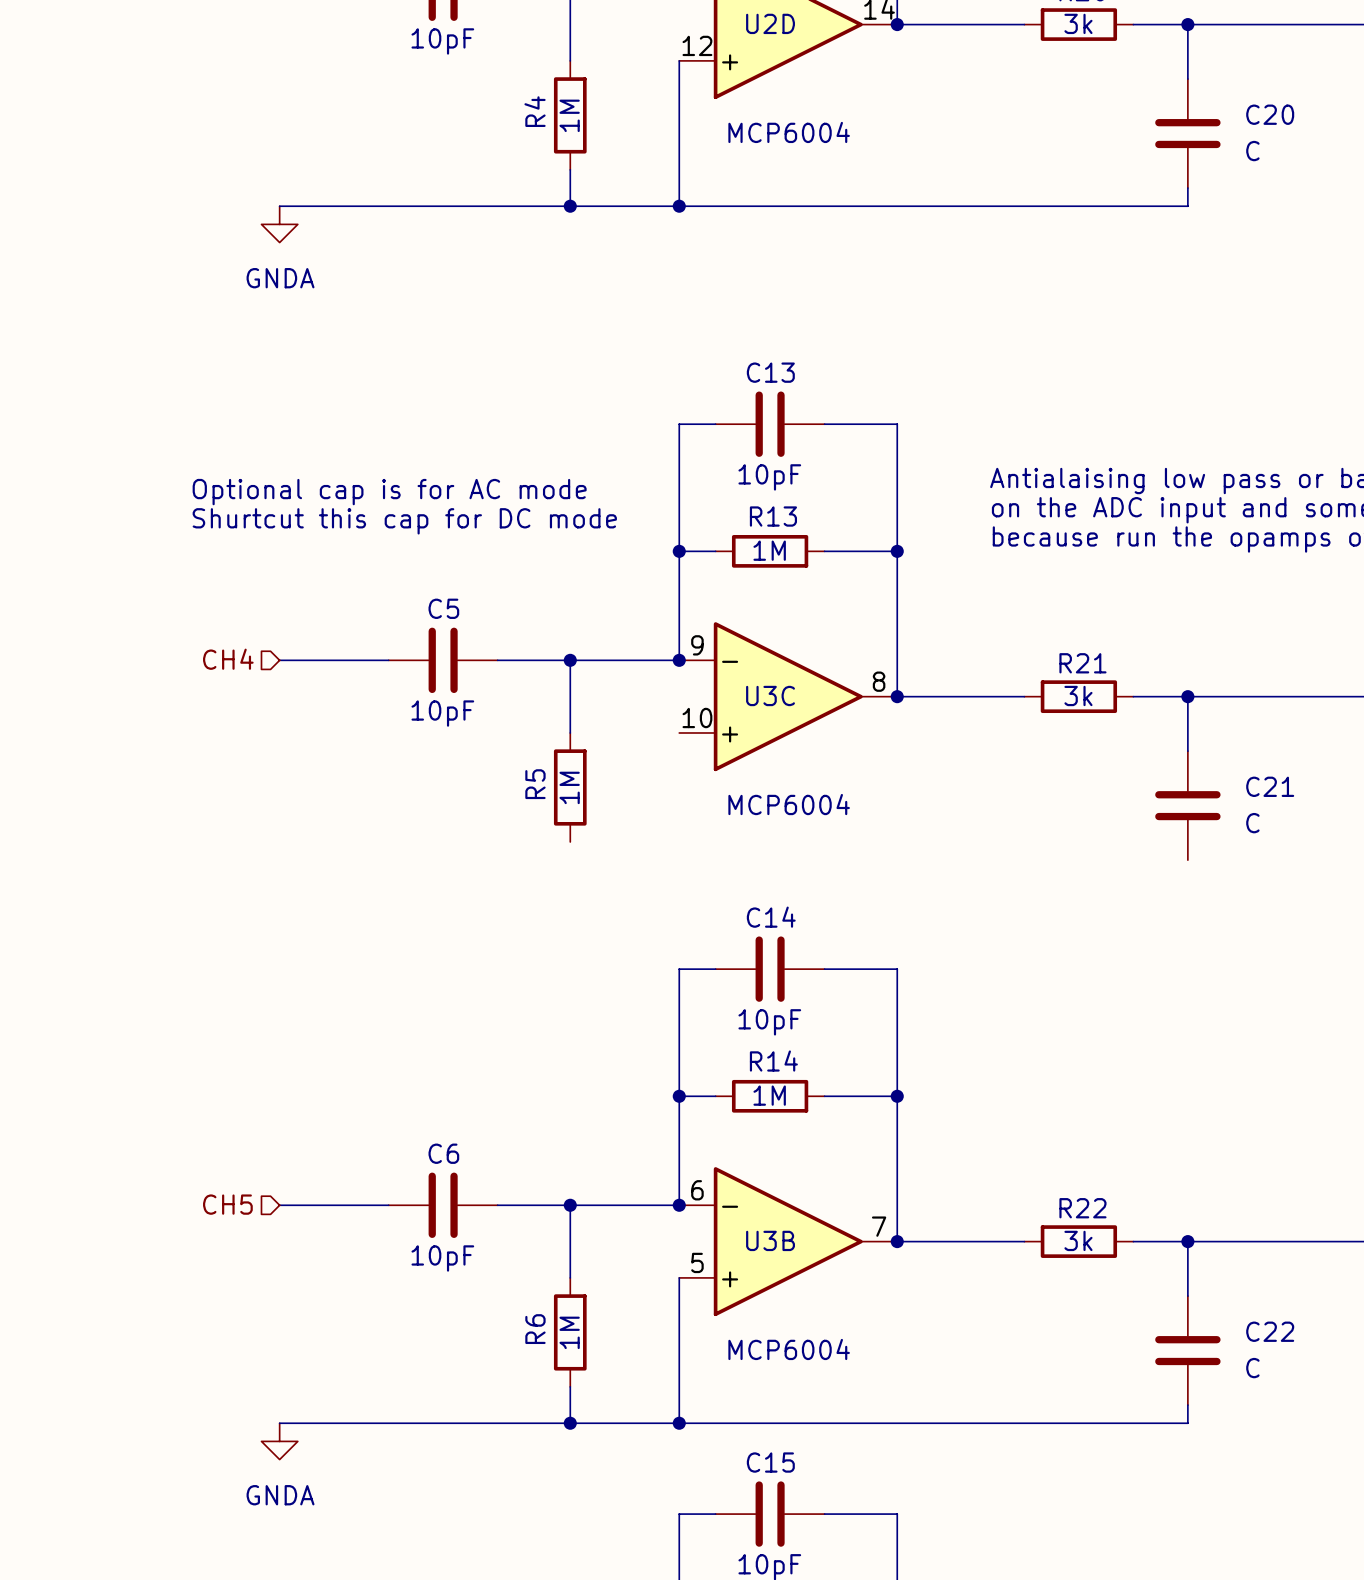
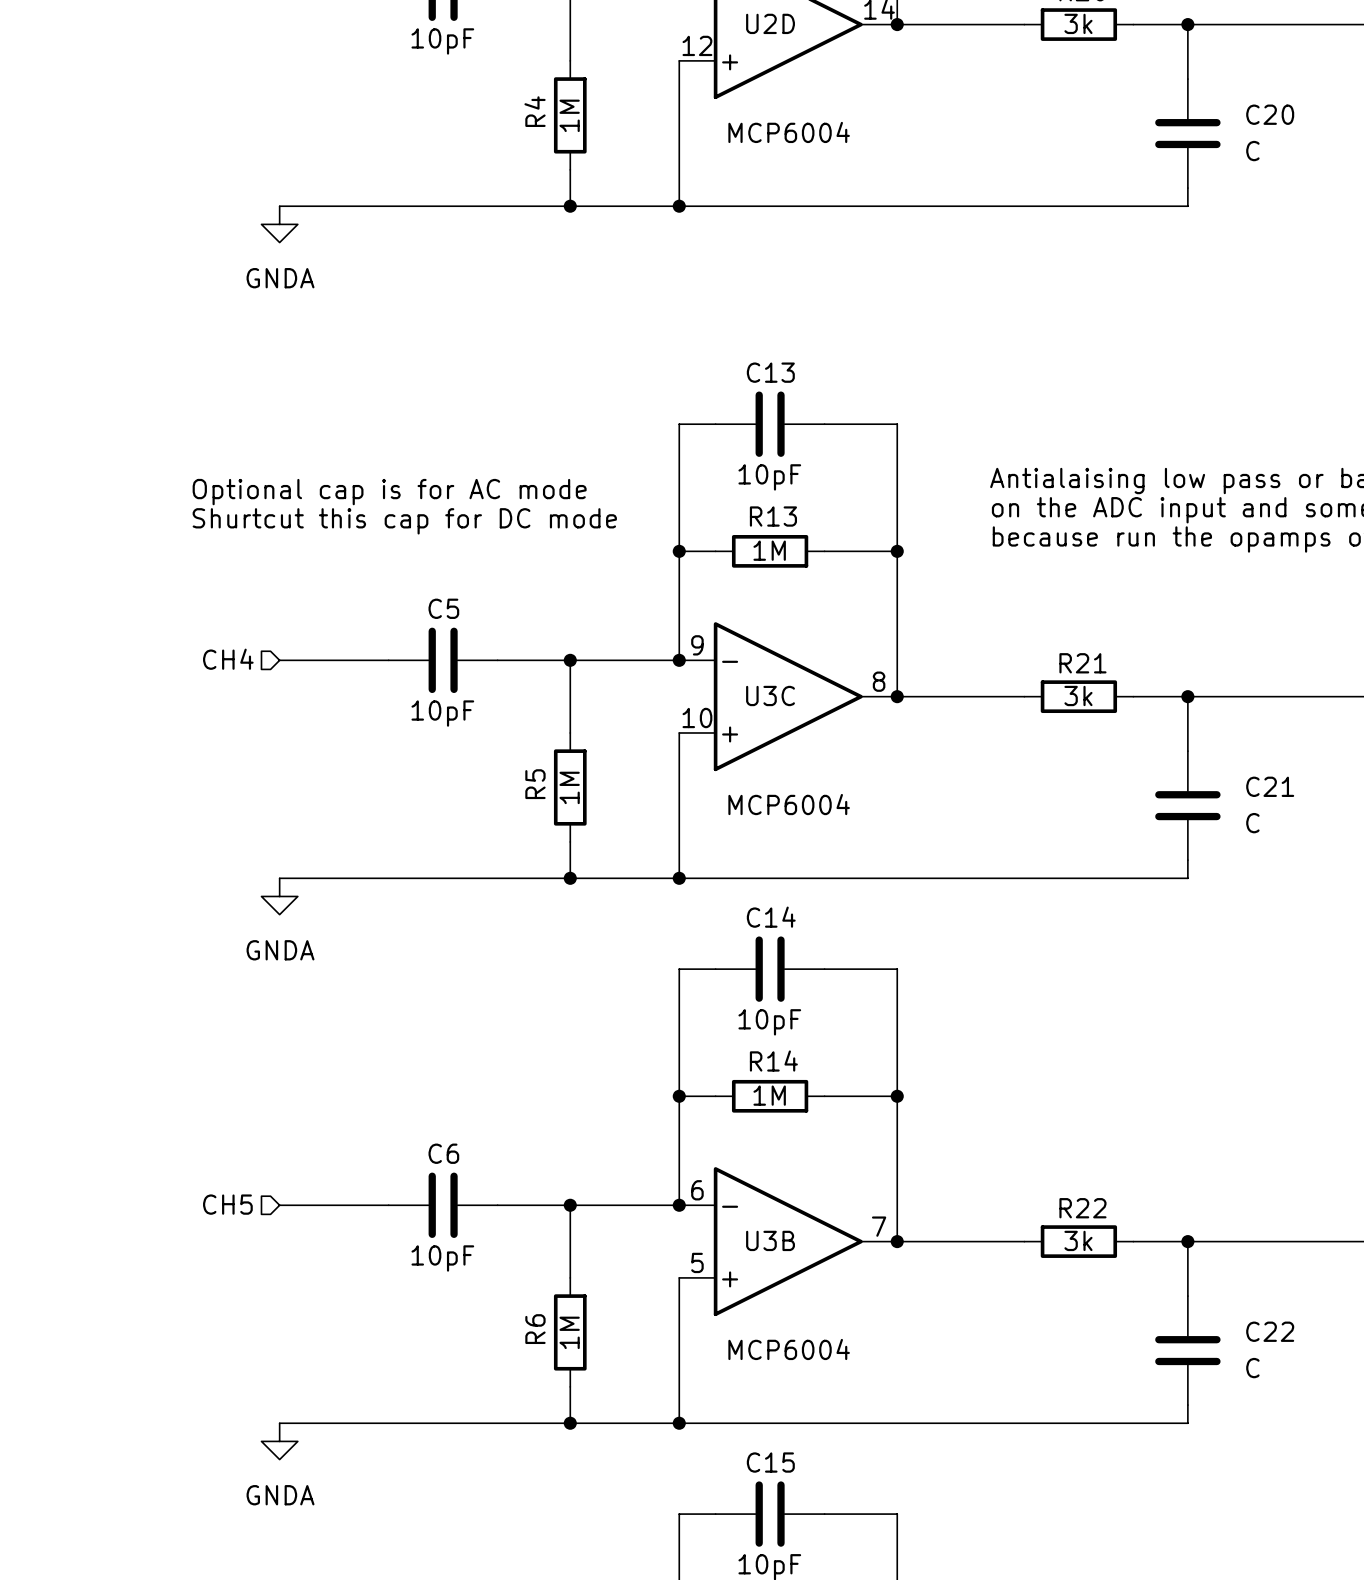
wire: none -> (679, 732) (679, 878)
wire: none -> (570, 841) (570, 878)
wire: none -> (1187, 860) (1187, 878) (279, 878)
junction: none -> (570, 878)
junction: none -> (679, 878)
power symbol: none -> GNDA (279, 896)

